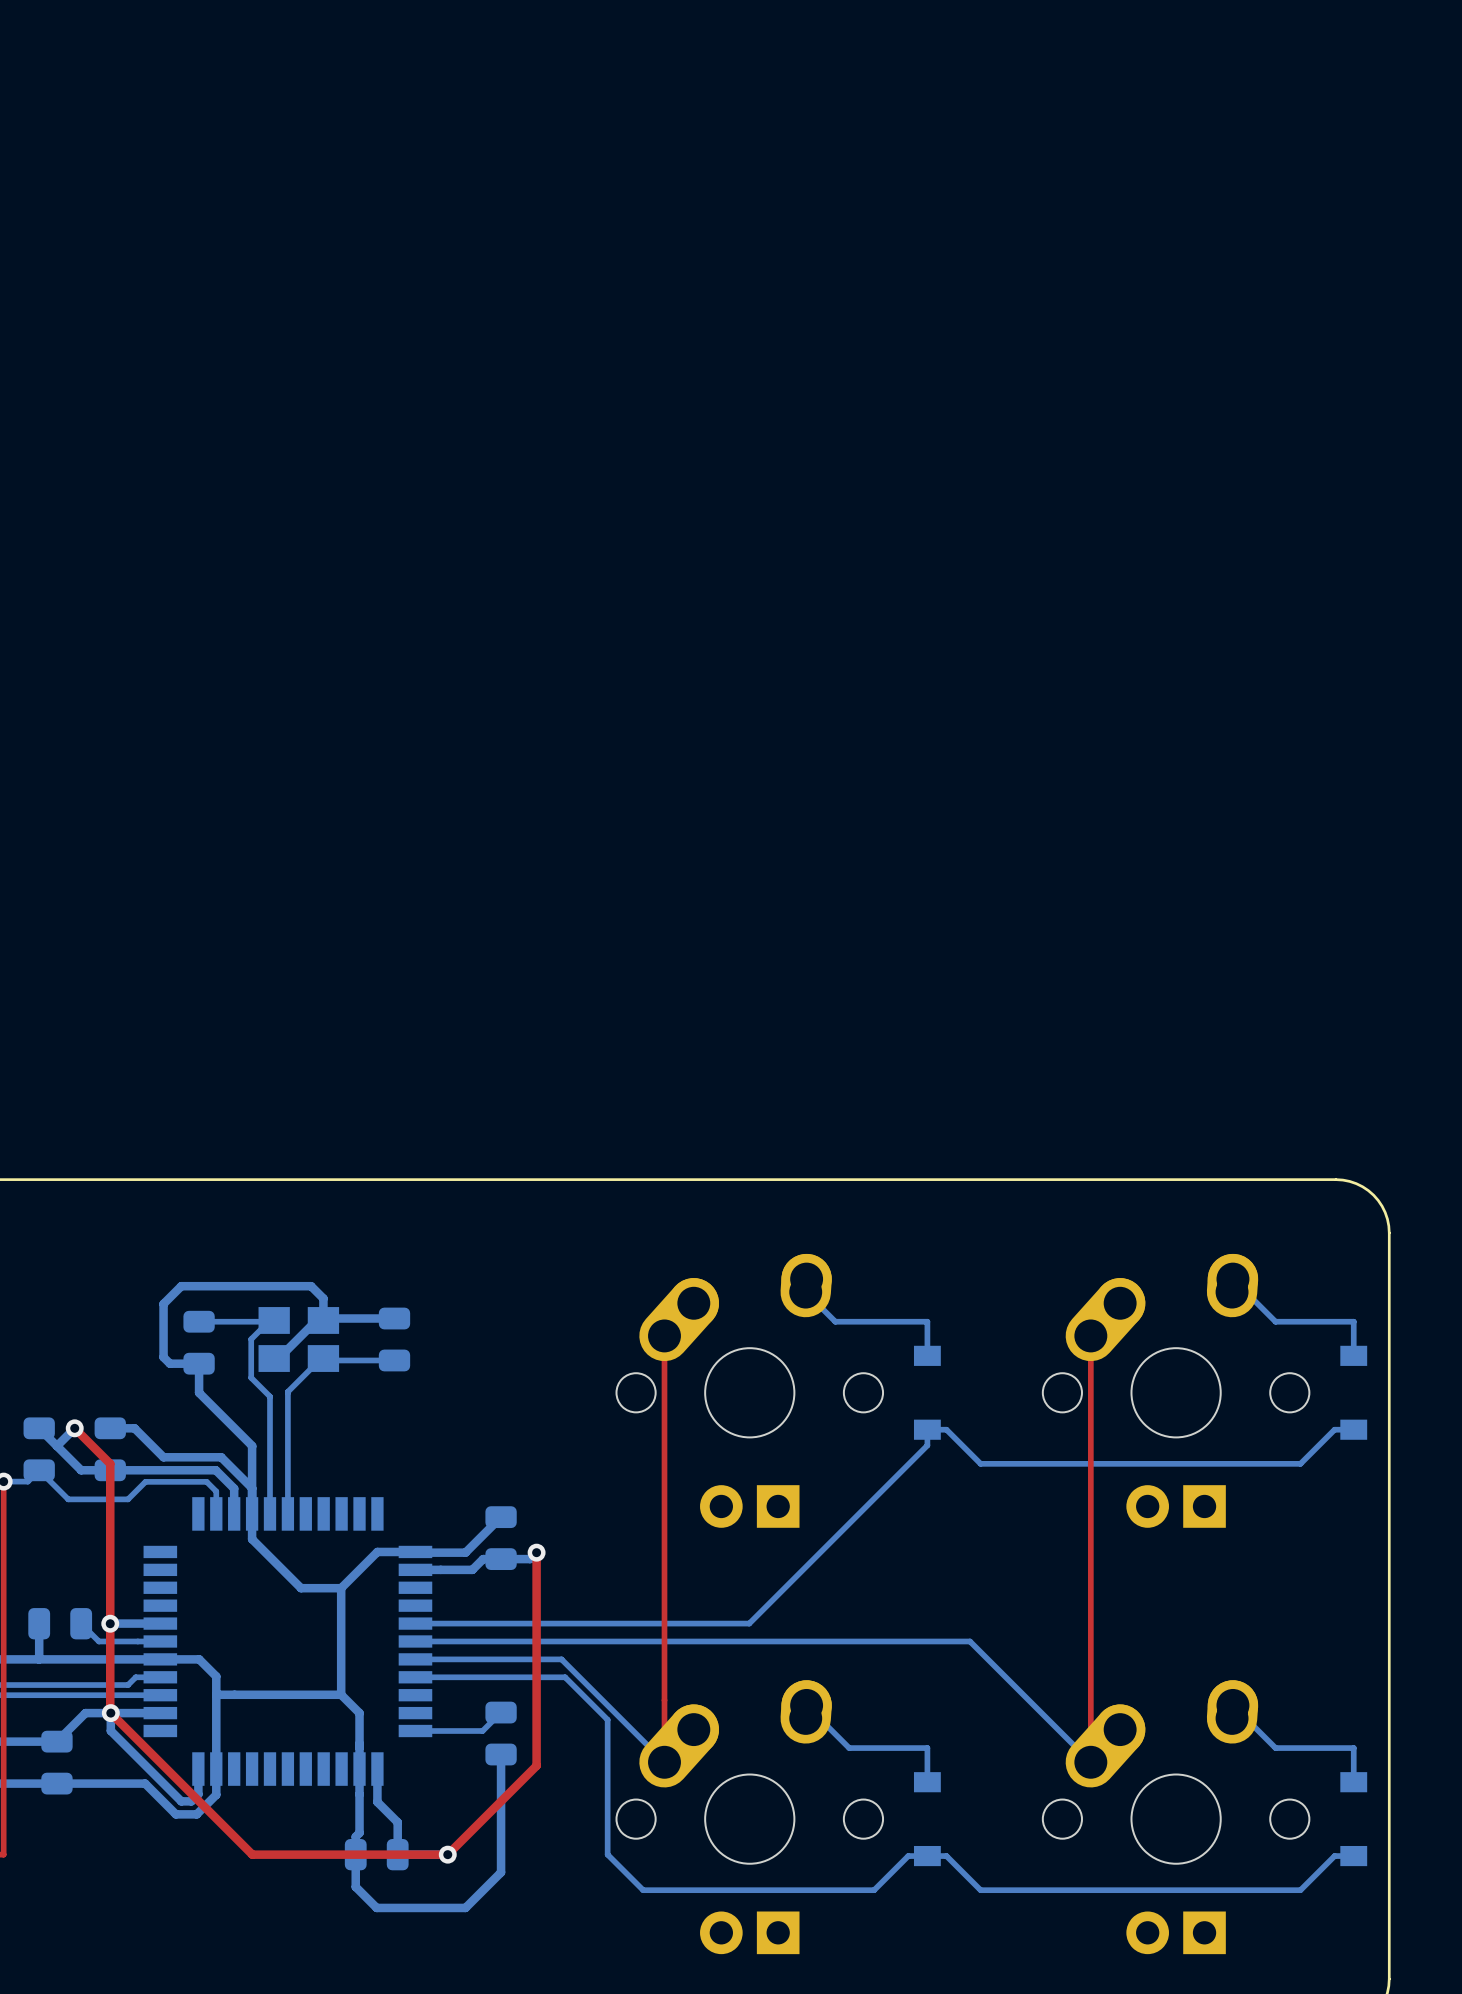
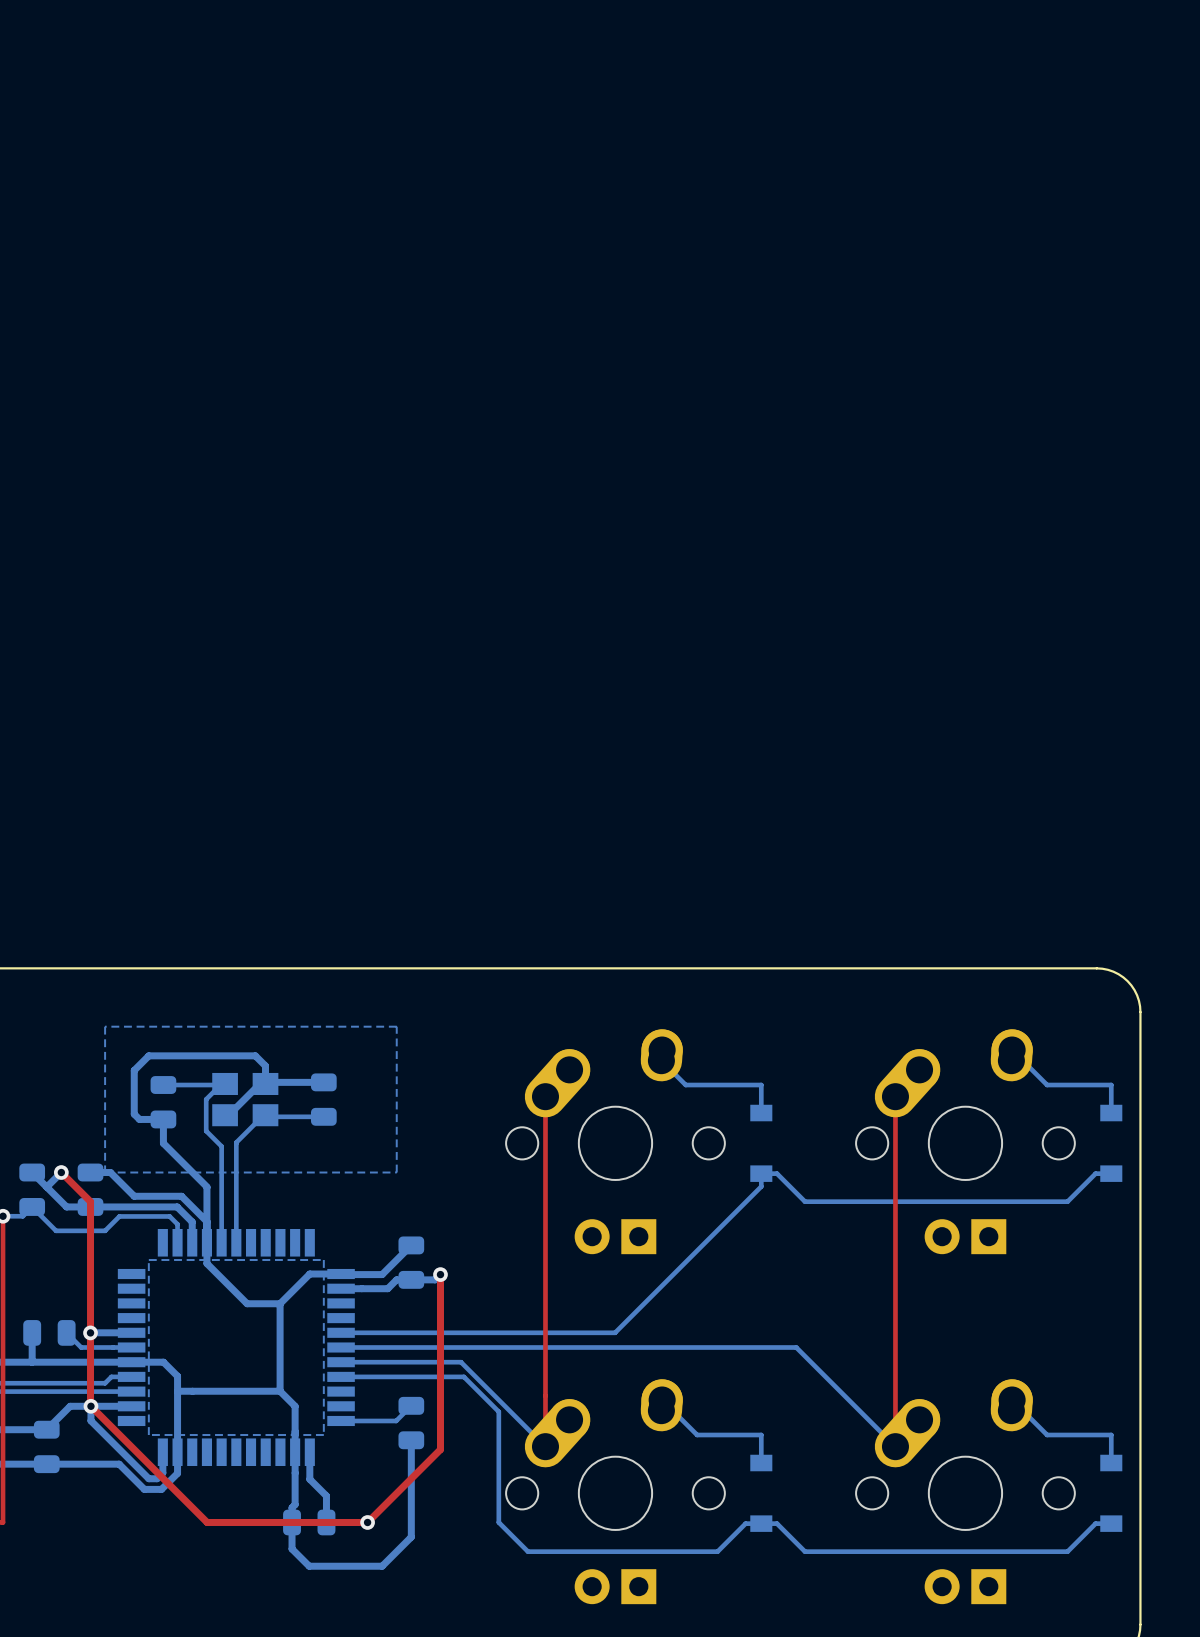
bottom zone outline: none -> (105, 1026) (396, 1026) (396, 1172) (105, 1172) (105, 1026)
bottom zone outline: none -> (148, 1260) (323, 1260) (323, 1434) (148, 1434) (148, 1260)

